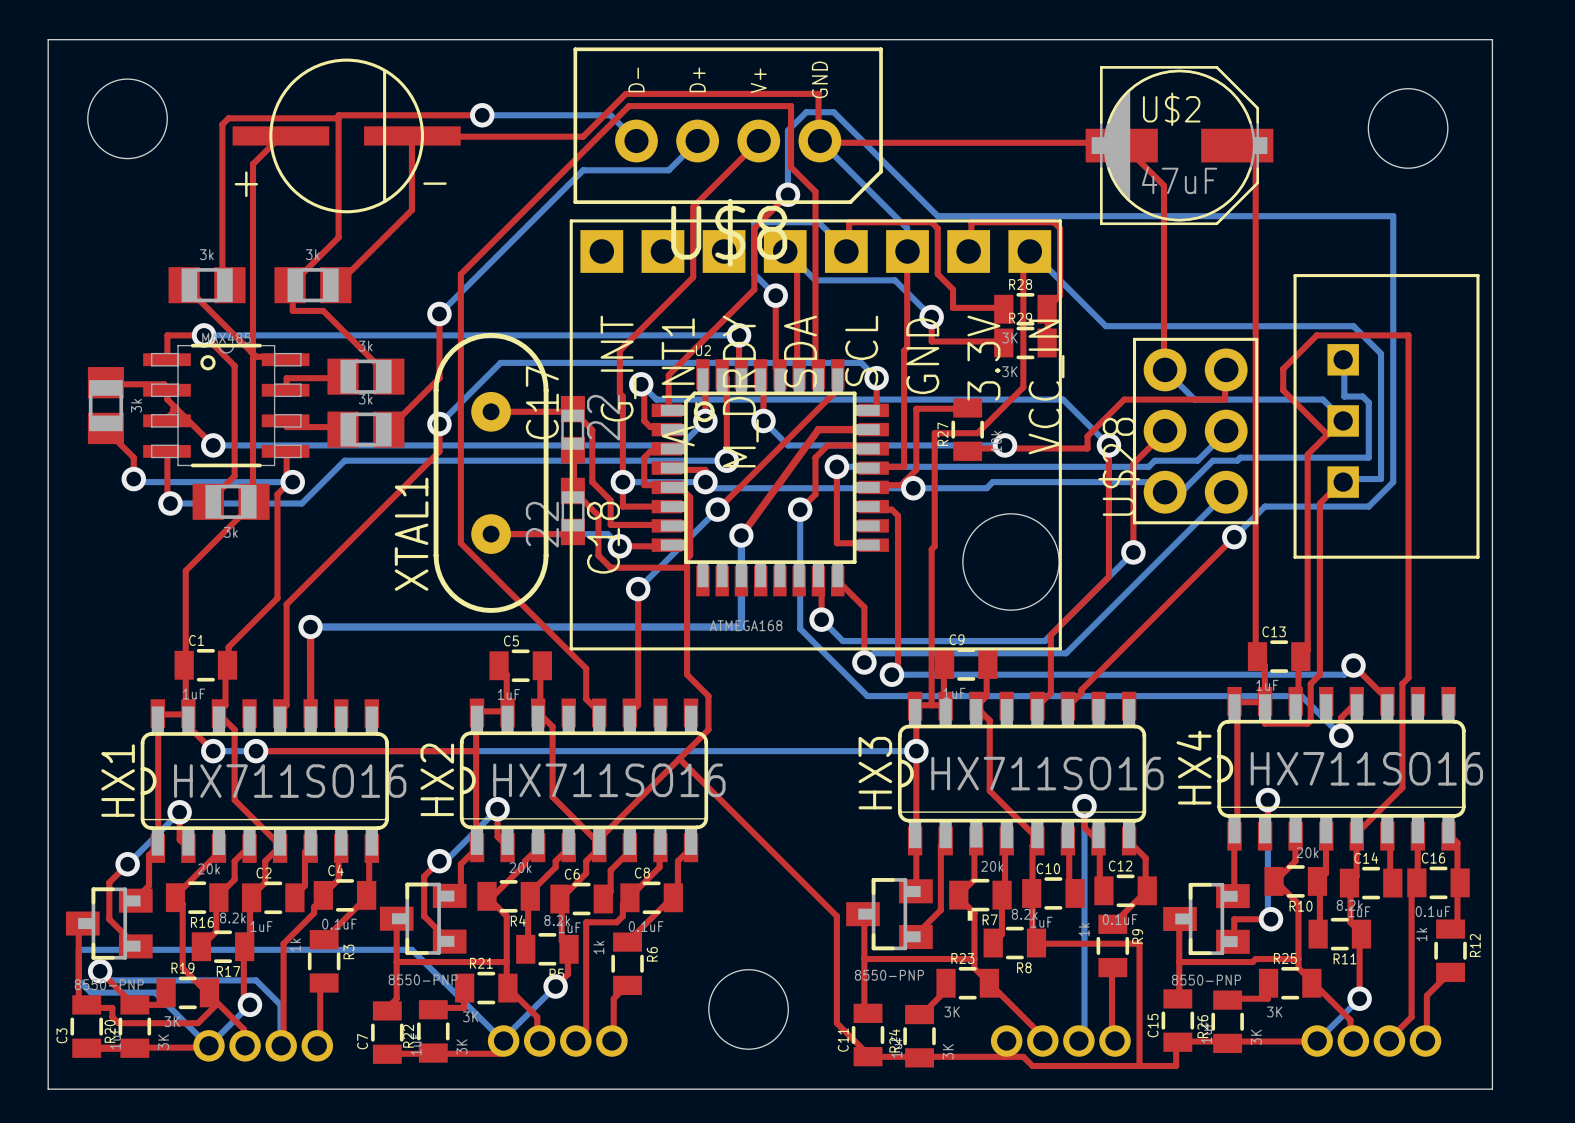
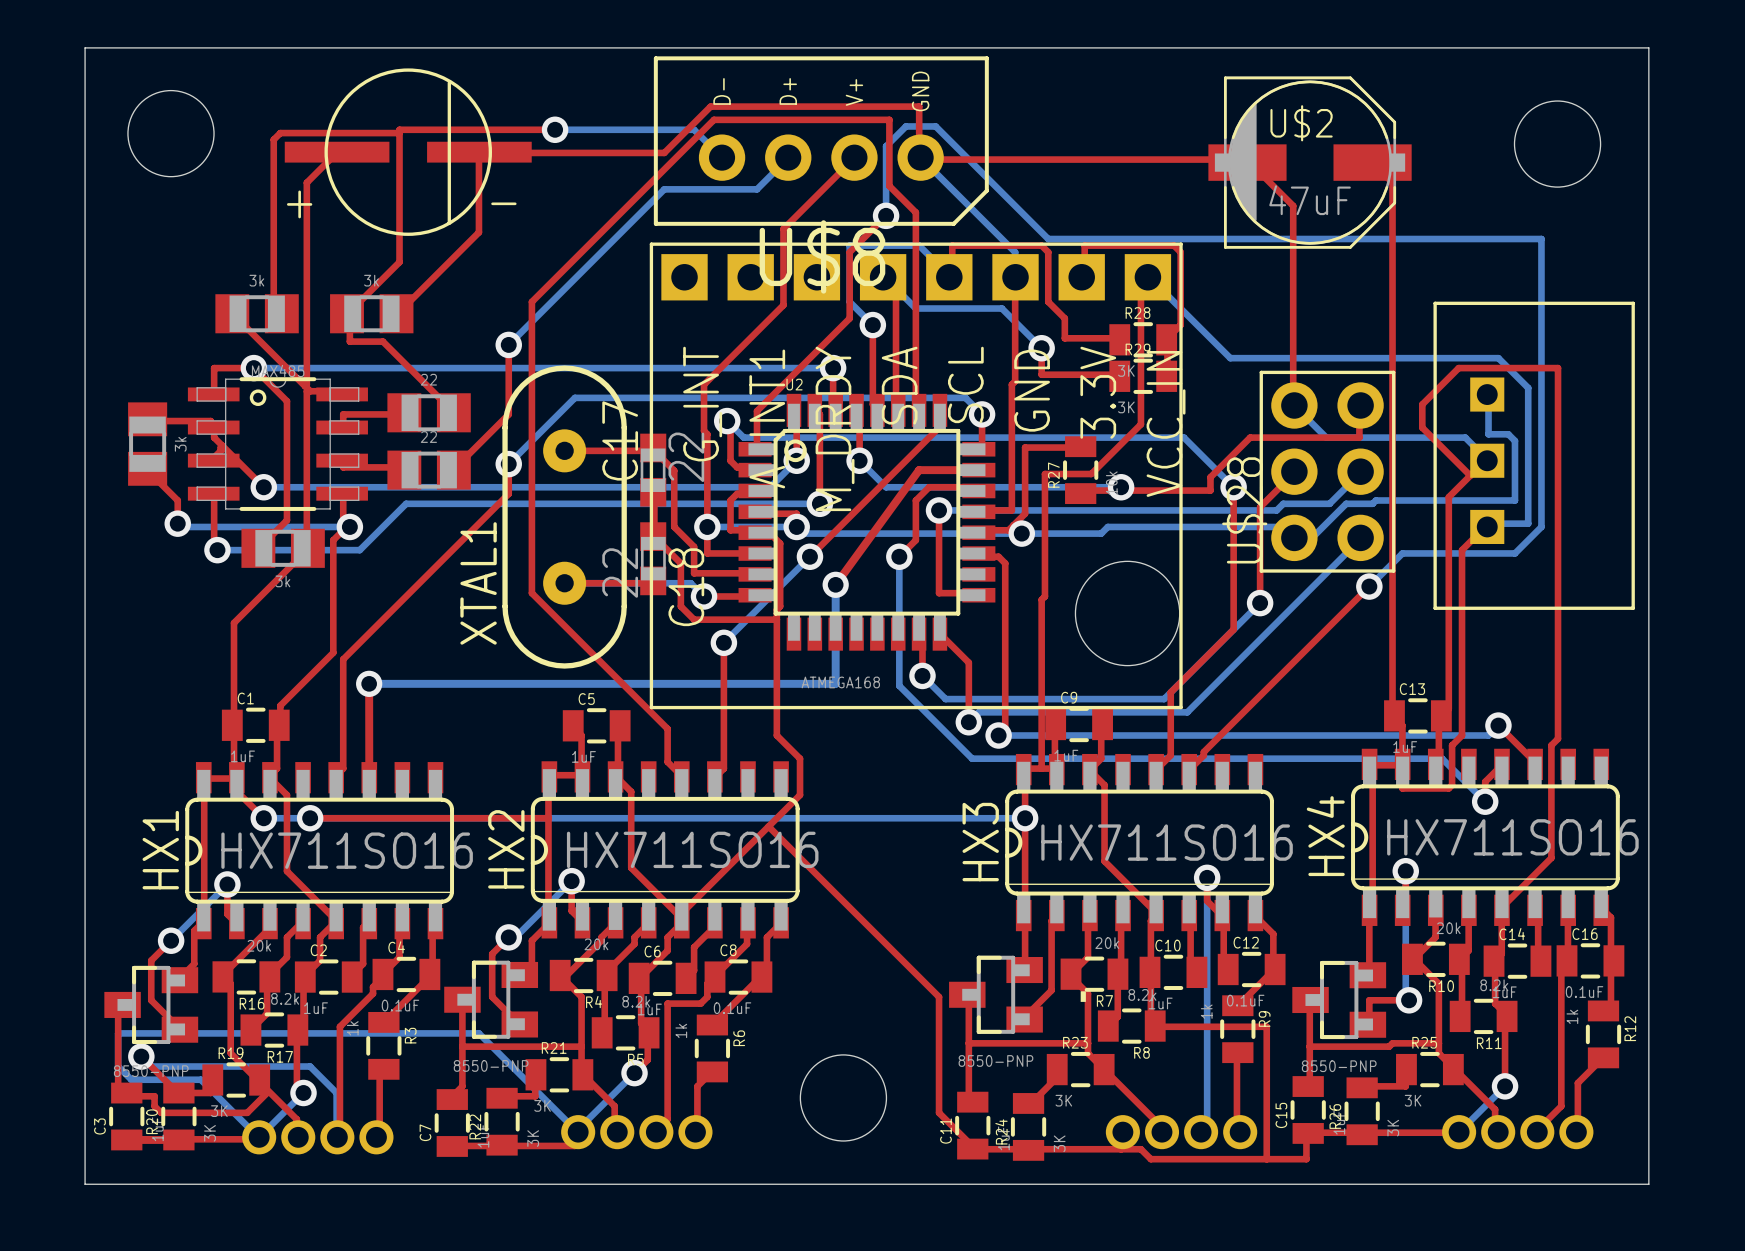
part value: 3k (365, 346) -> 22 (428, 379)
part value: 3k (365, 399) -> 22 (428, 437)

